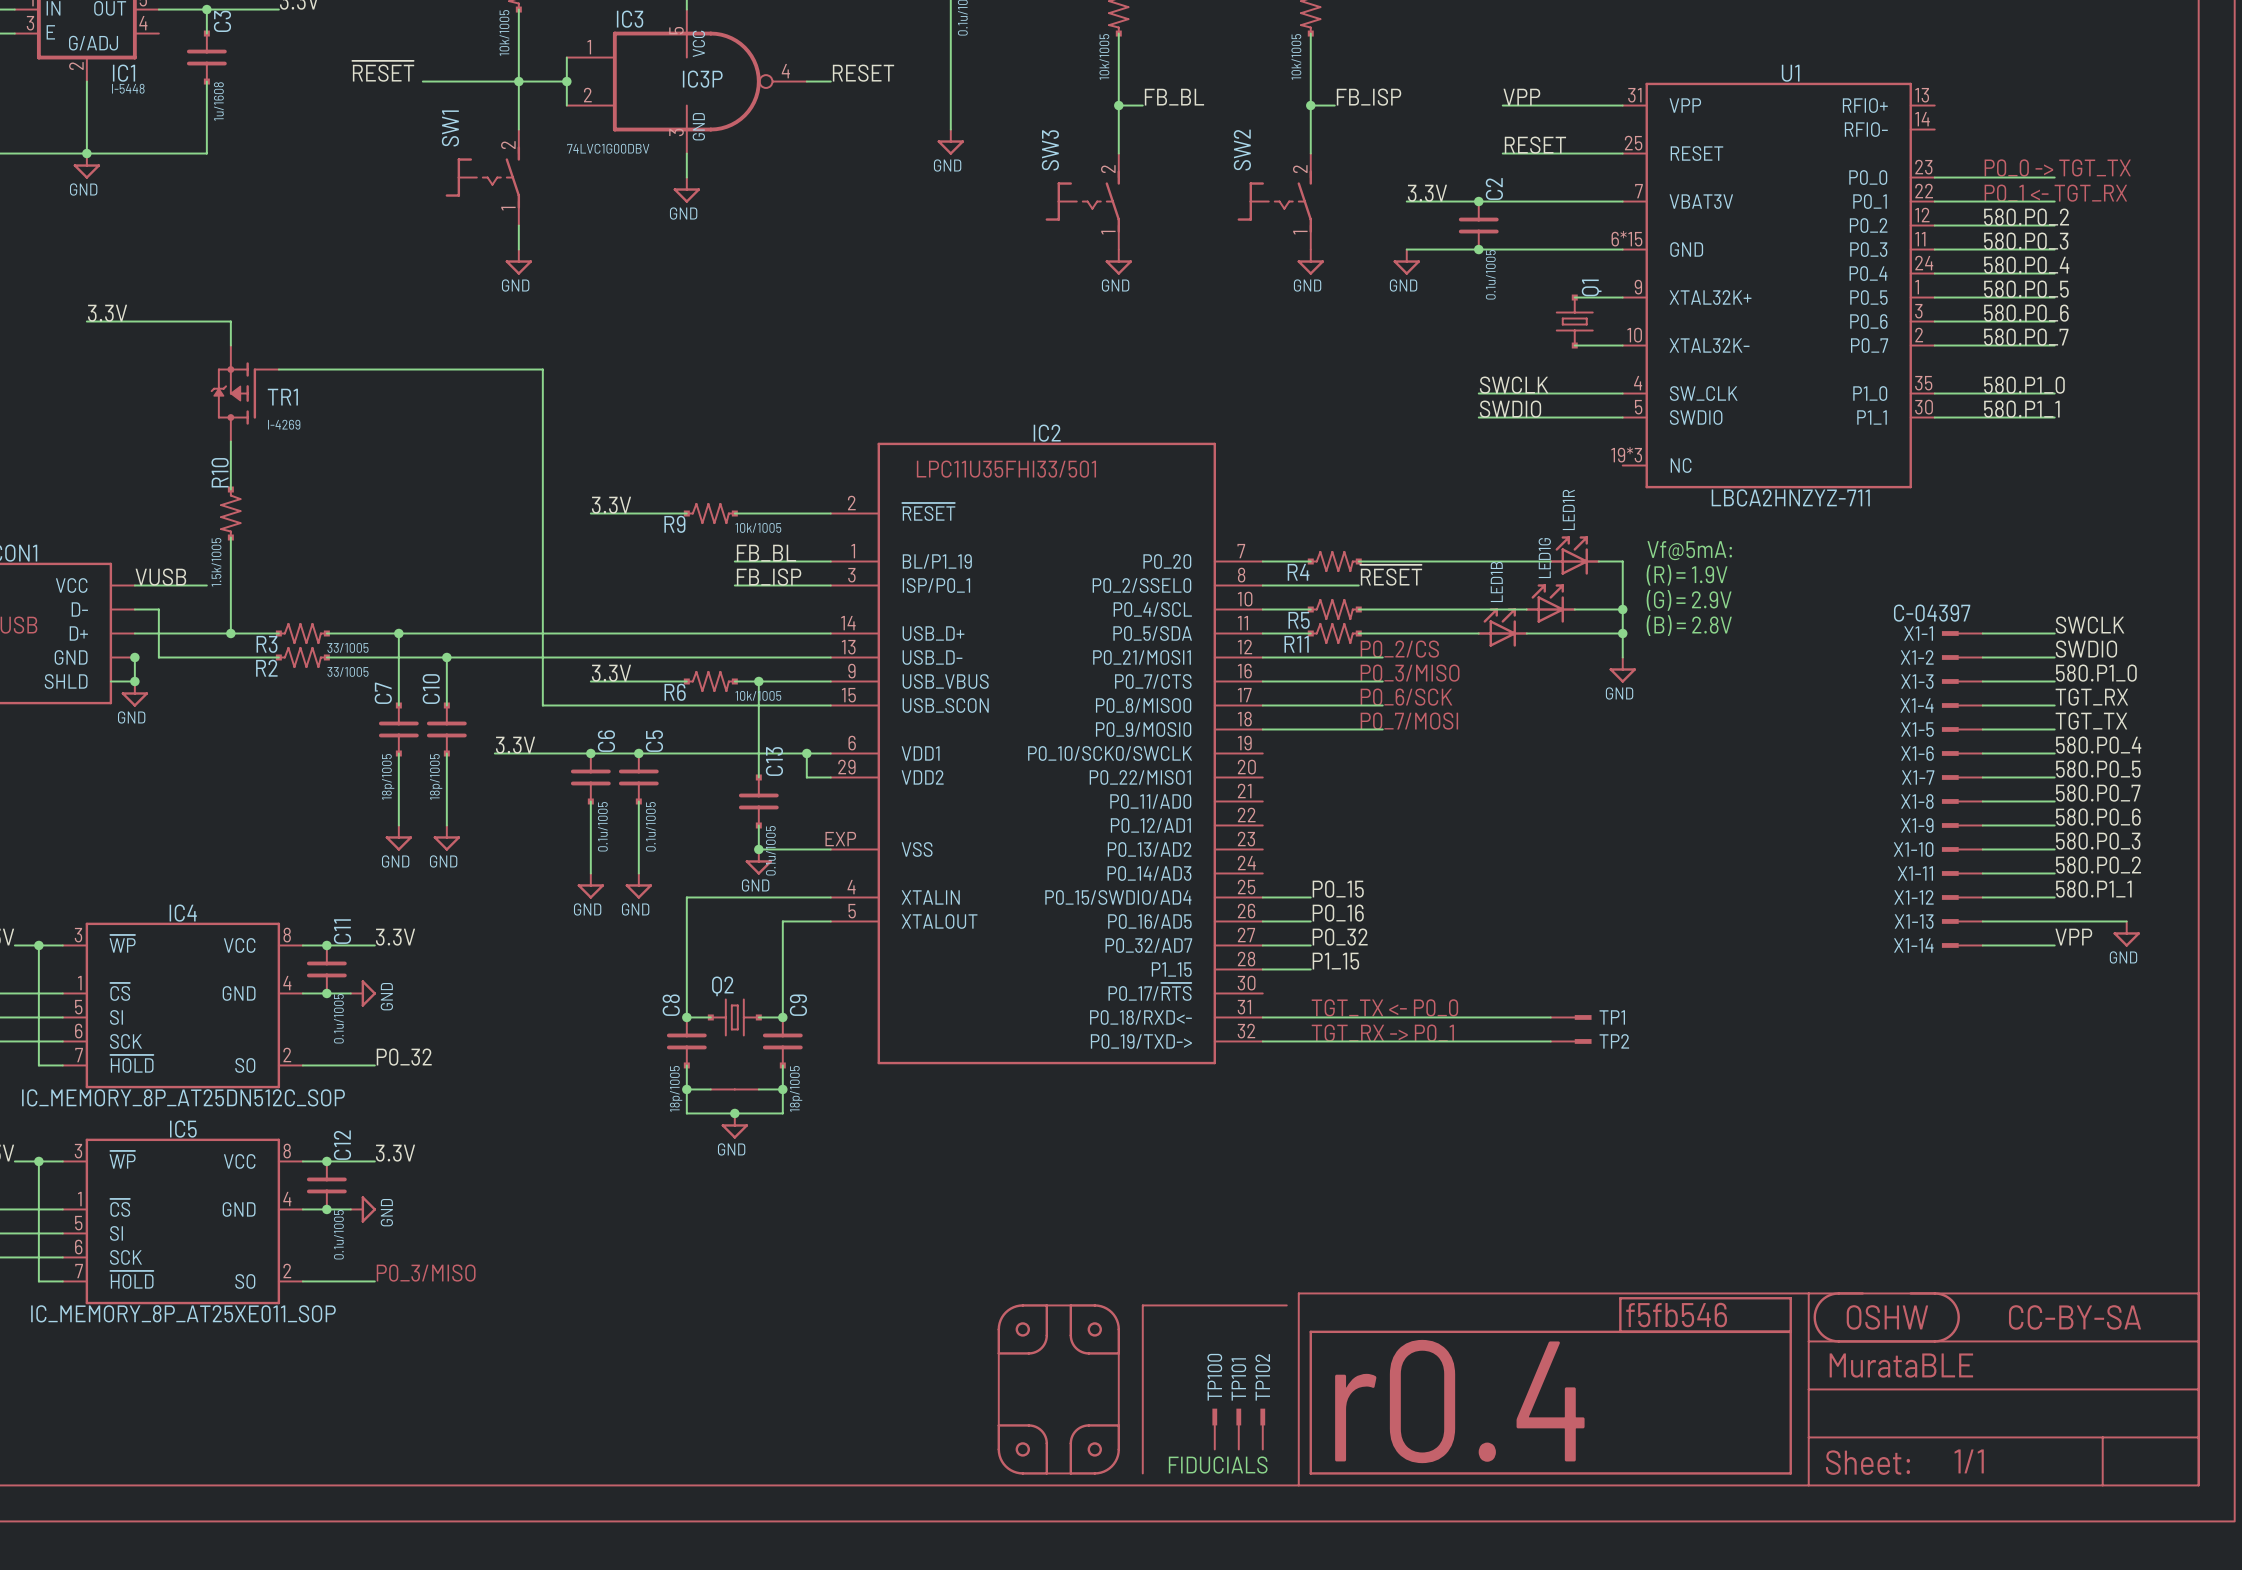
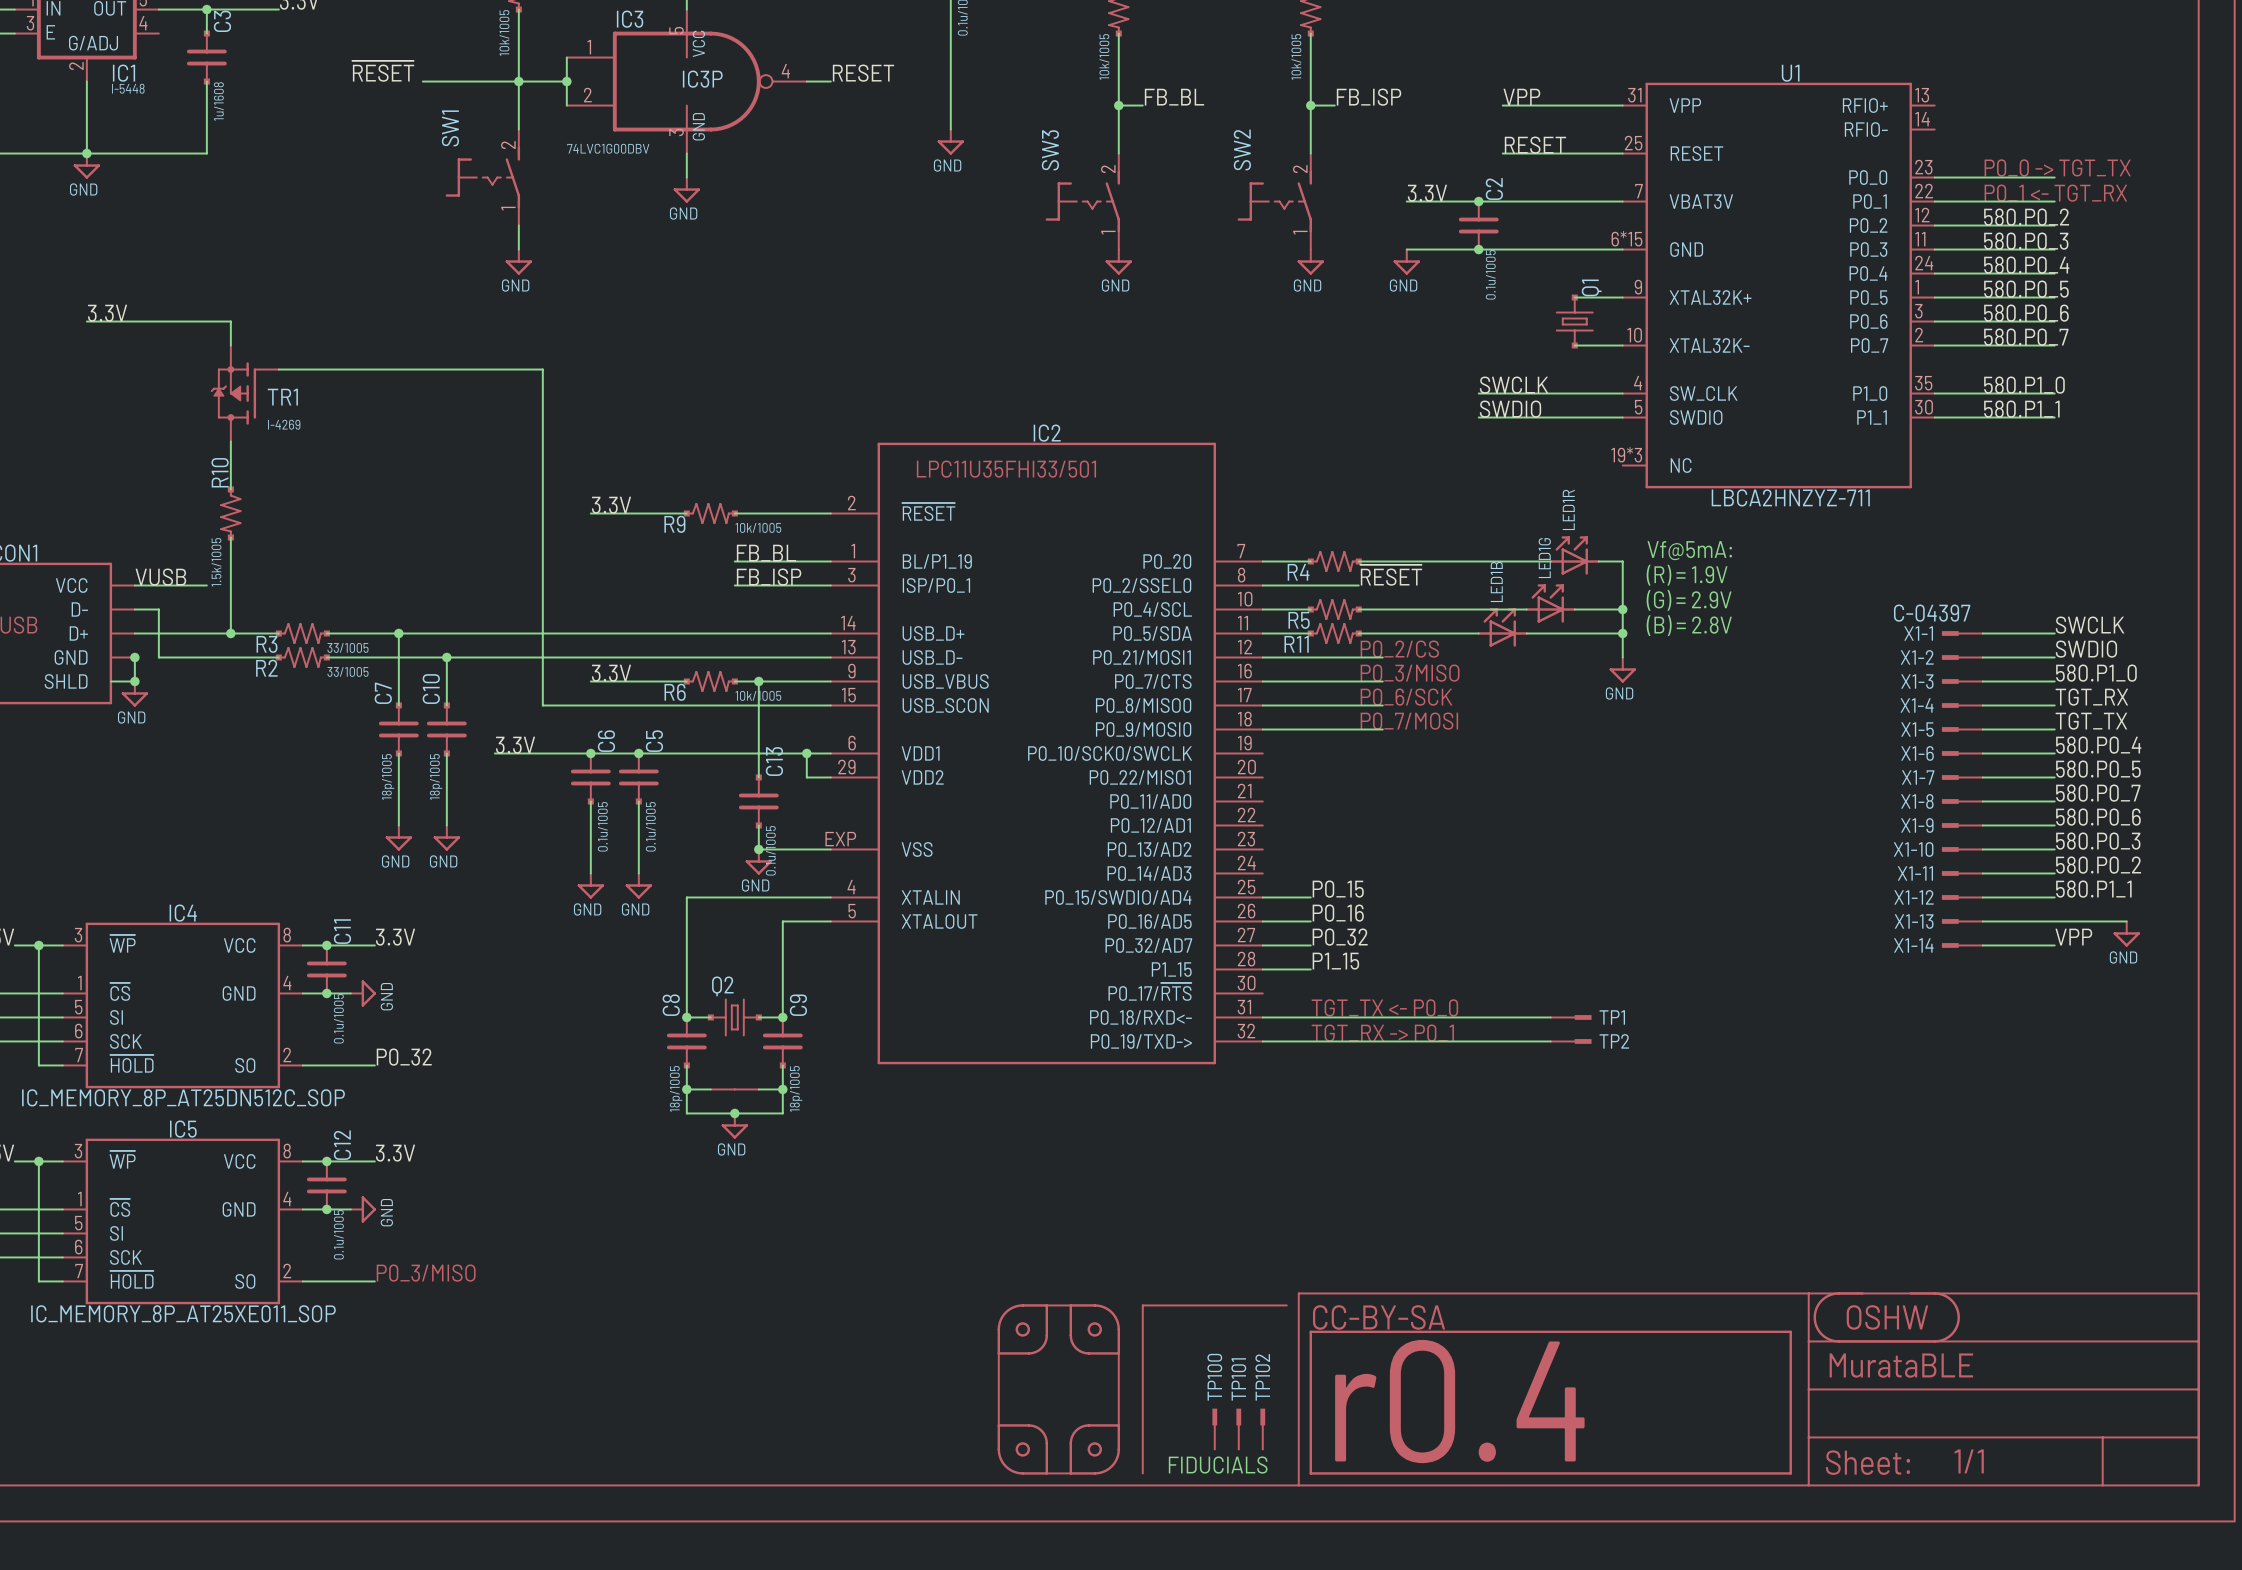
part: f5fb546 (1705, 1315) -> none
text: none -> CC-BY-SA (1379, 1317)
text: CC-BY-SA (2074, 1317) -> none

